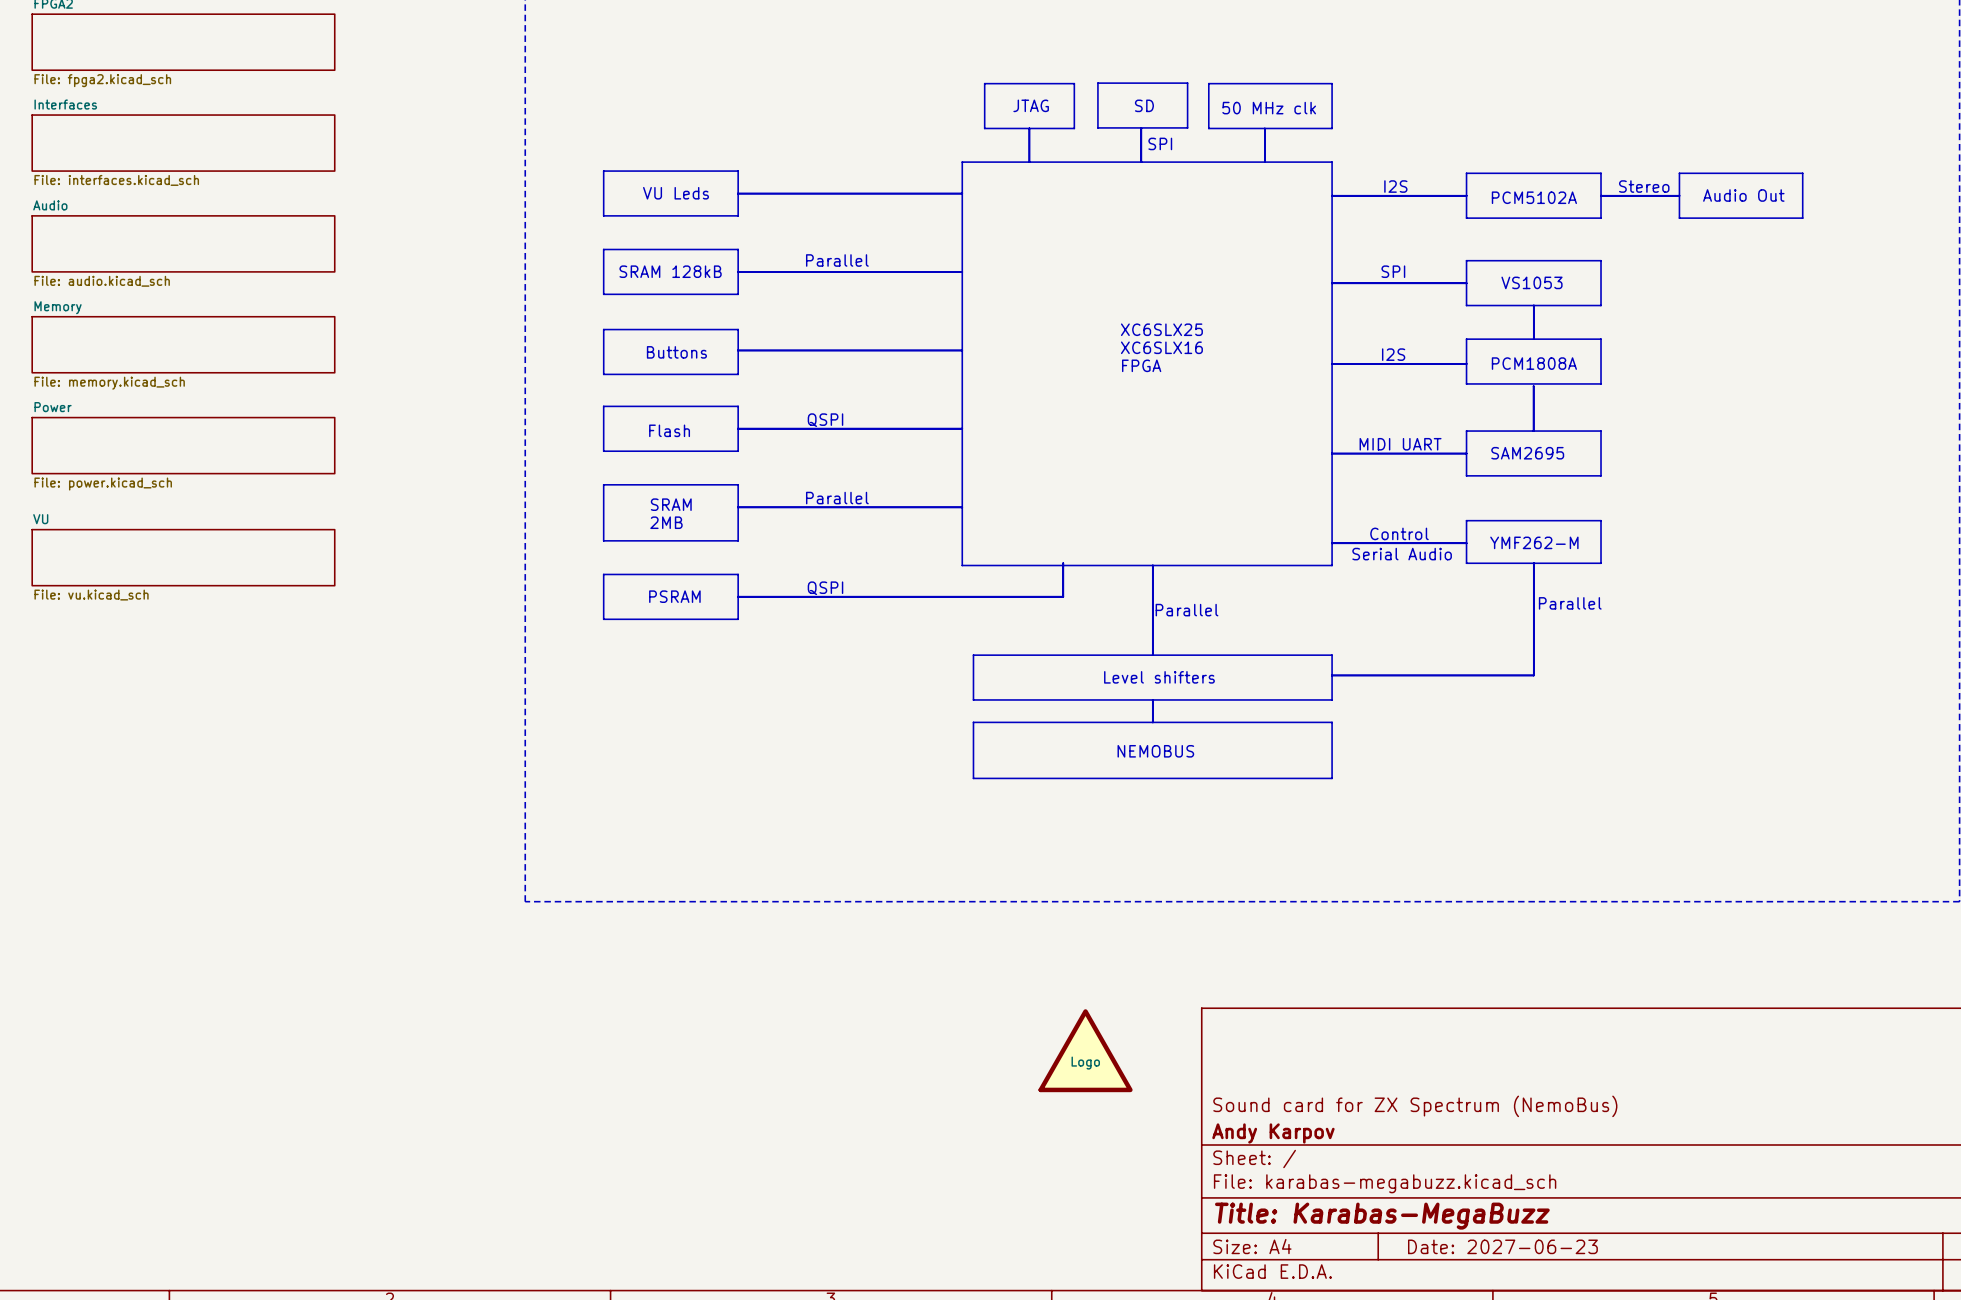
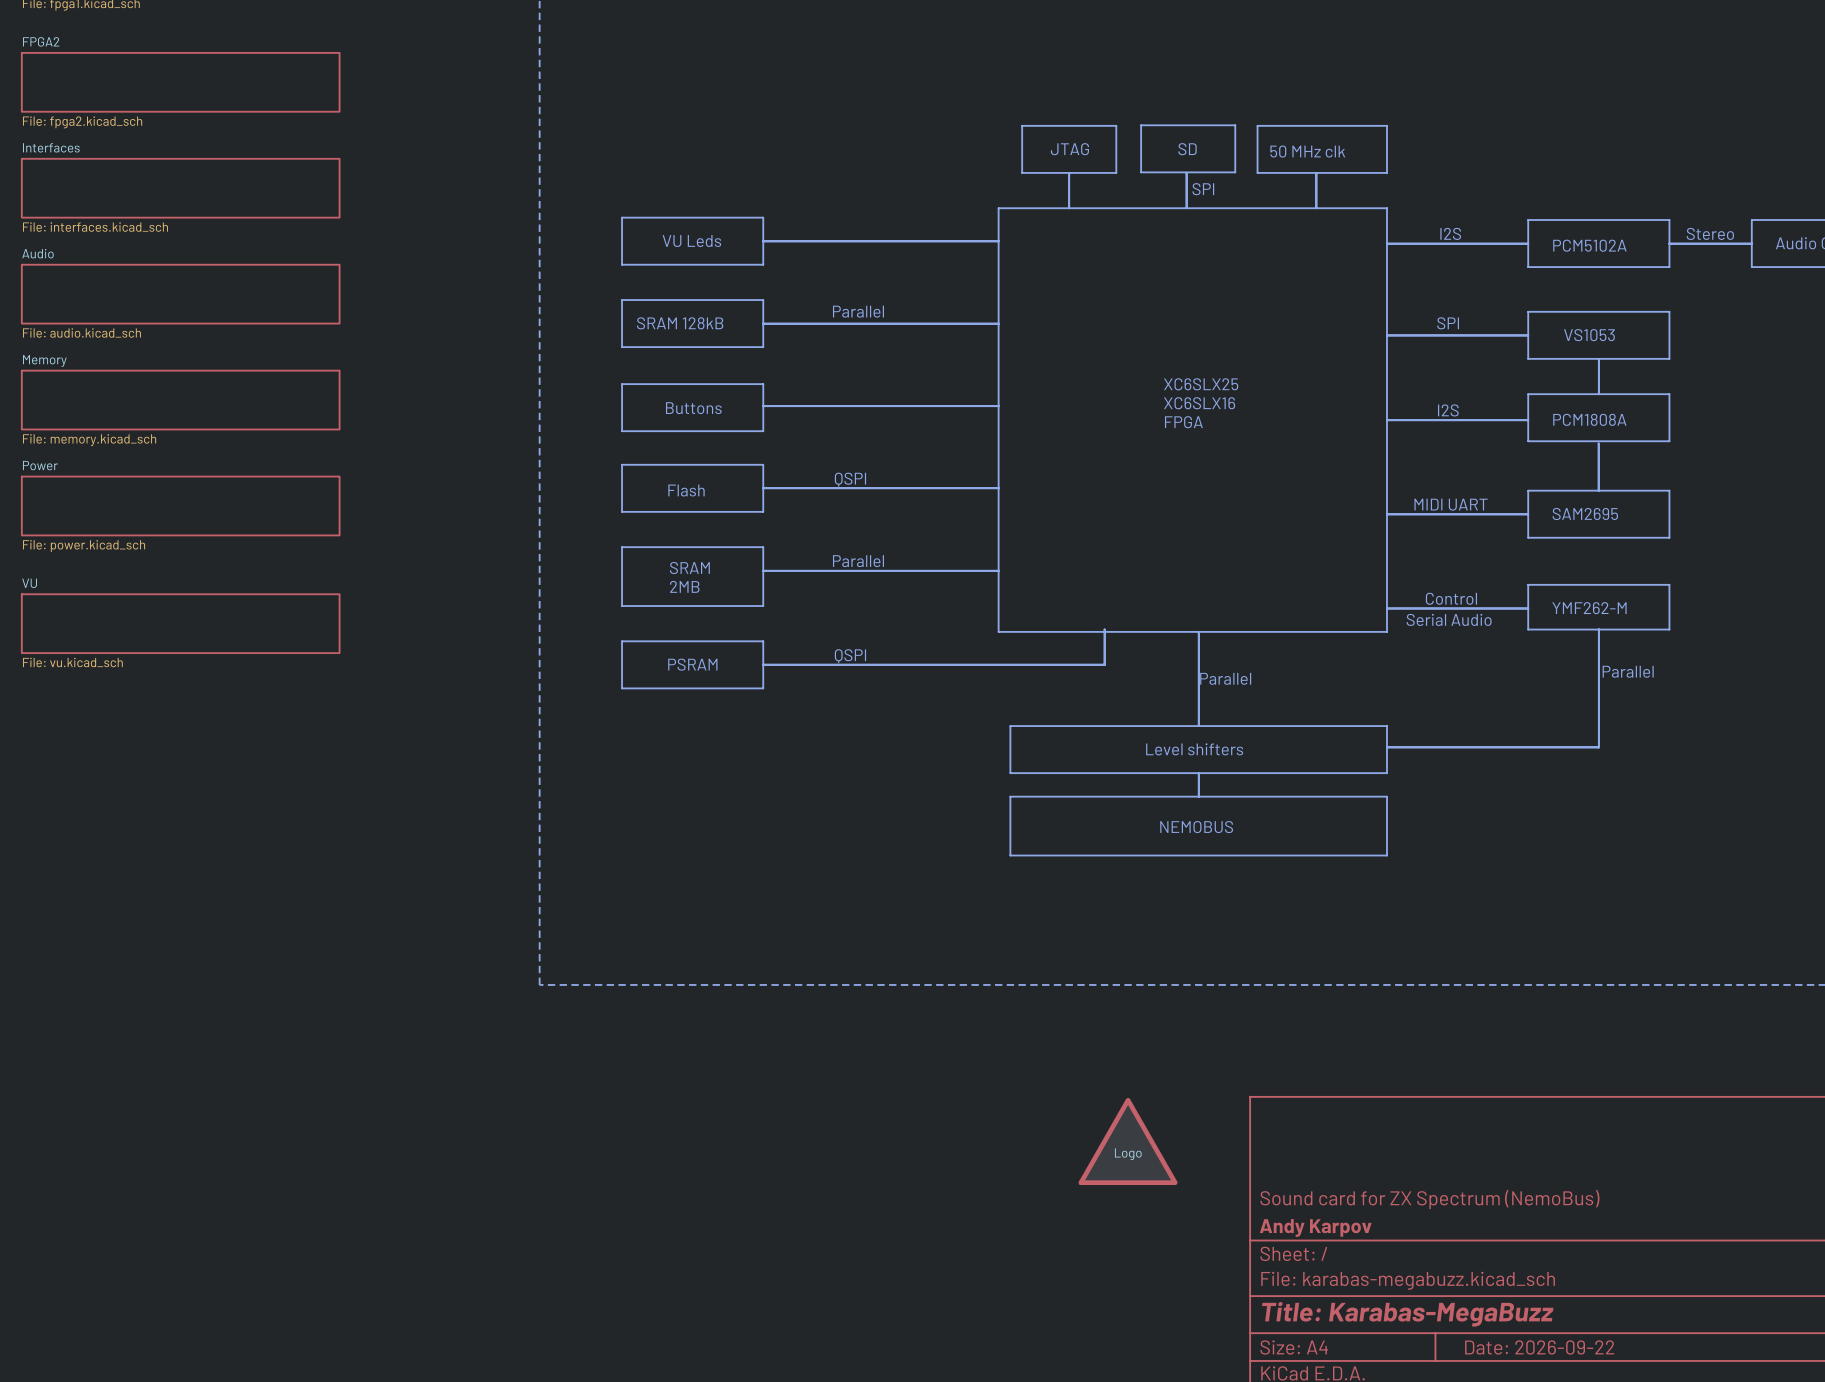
title block: Date: 2027-06-23 (1502, 1246) -> Date: 2026-09-22 (1539, 1347)

